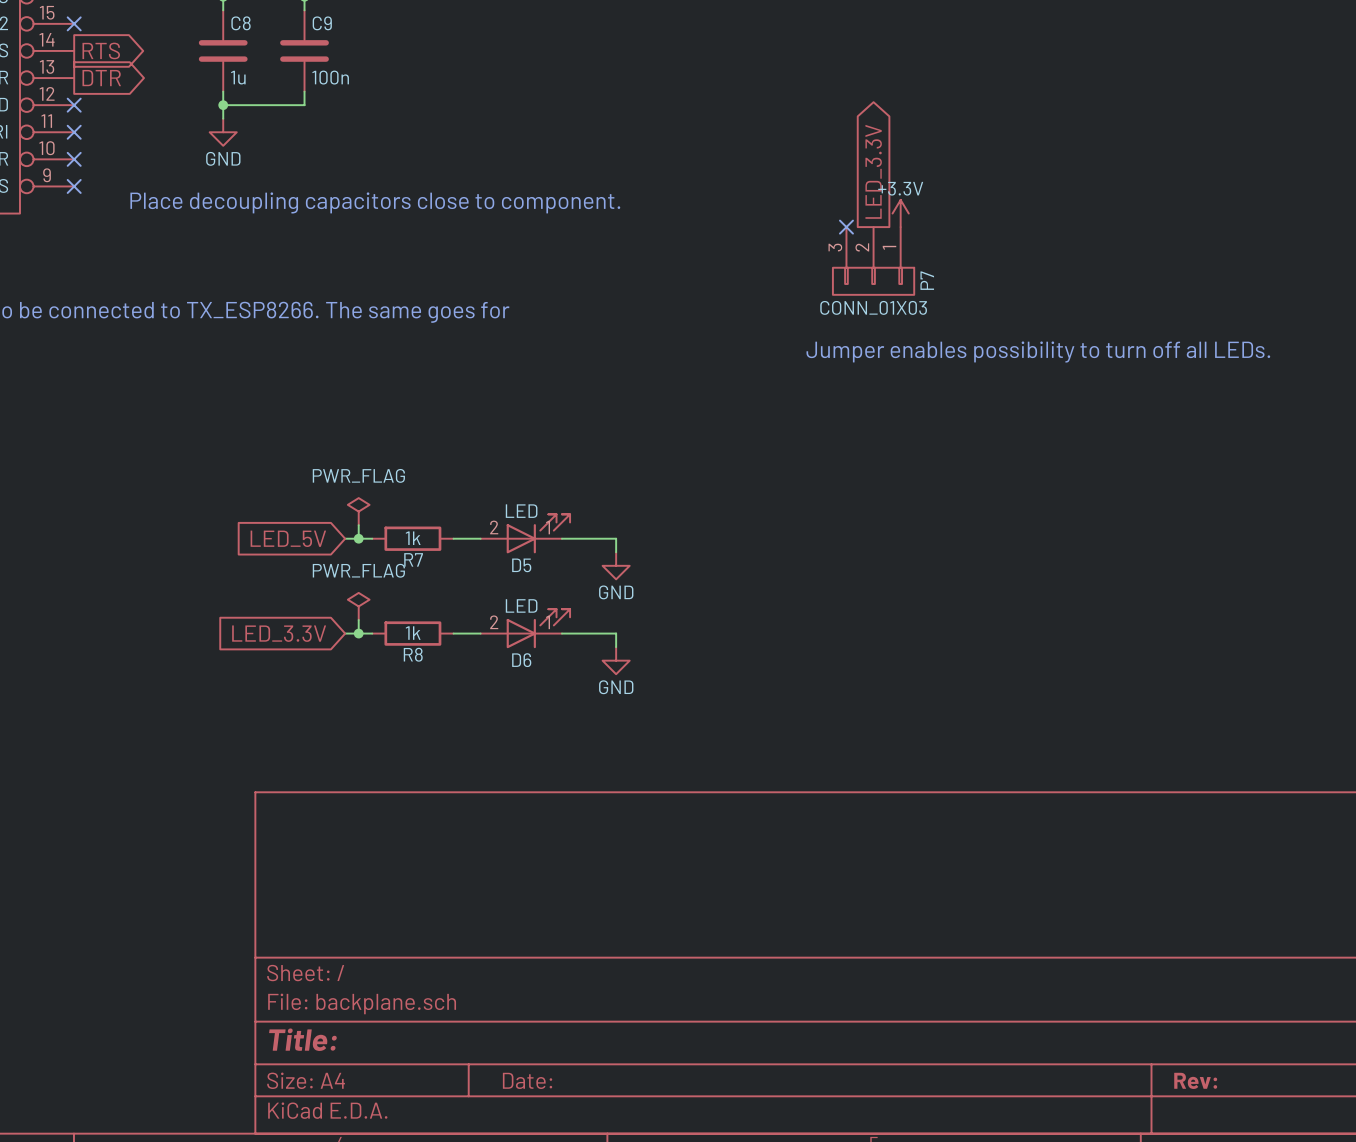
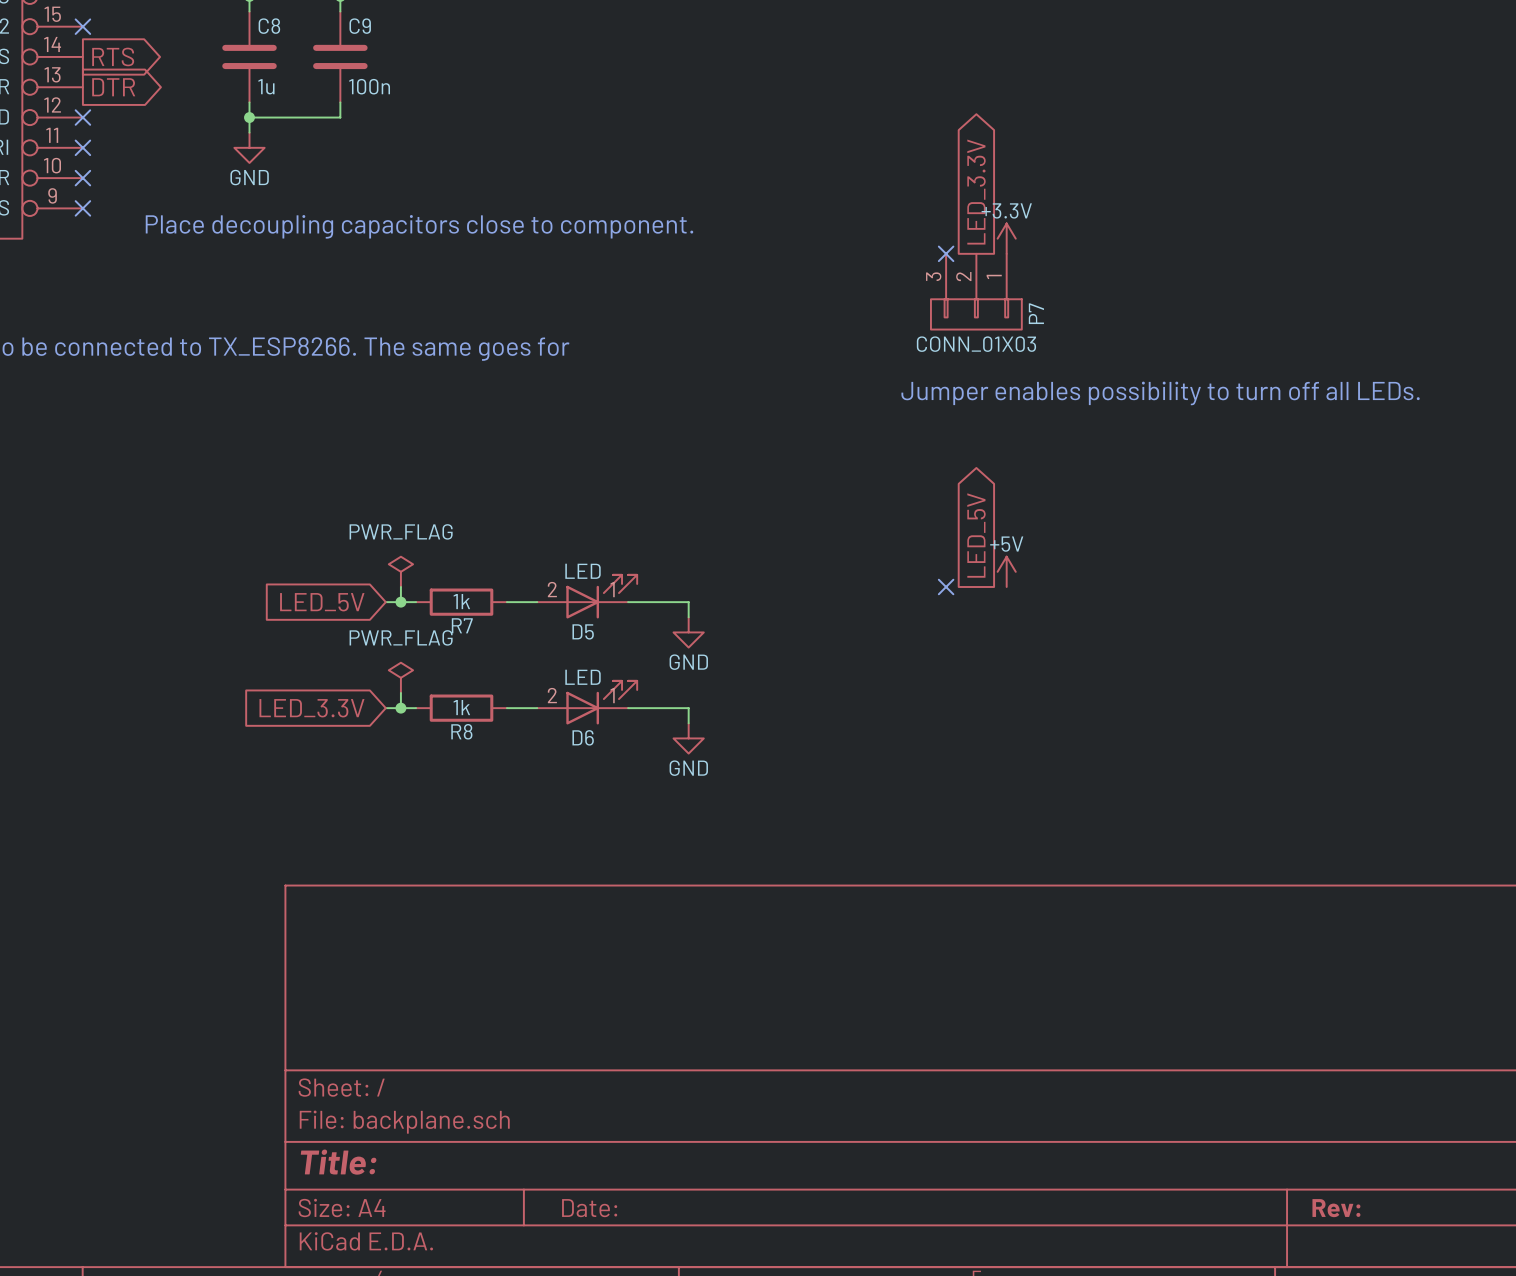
global label: none -> LED_5V (976, 535)
power symbol: none -> +5V (1006, 571)
no-connect mark: none -> (946, 586)

